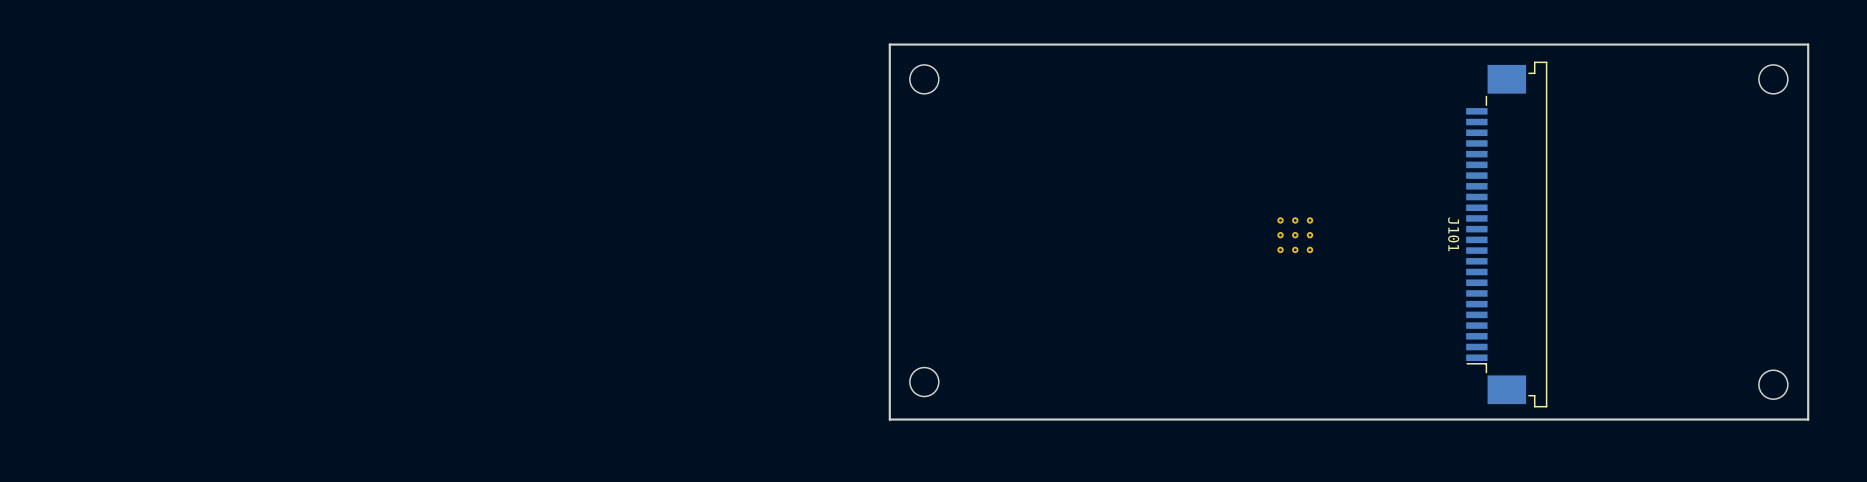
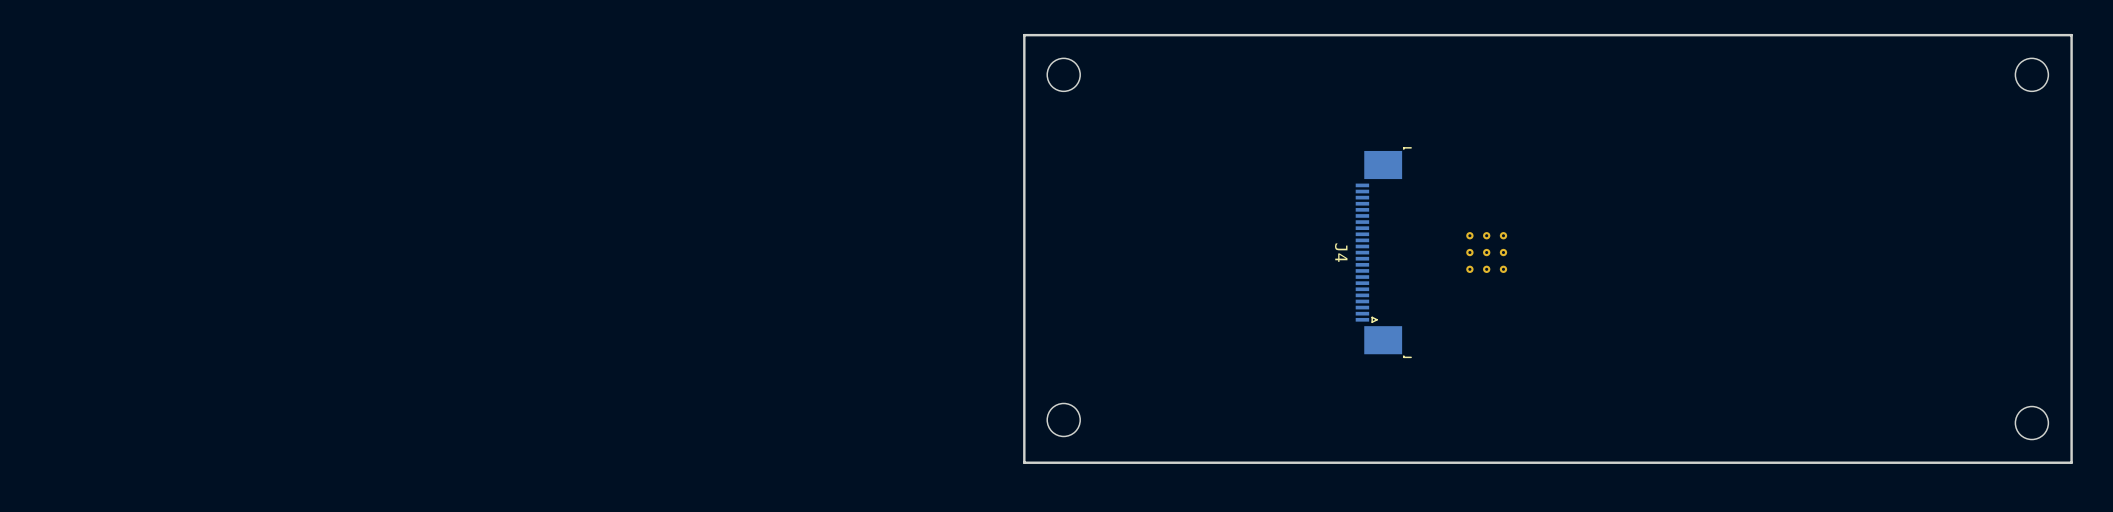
J101: (1506, 234) -> none
J4: none -> (1383, 252)

